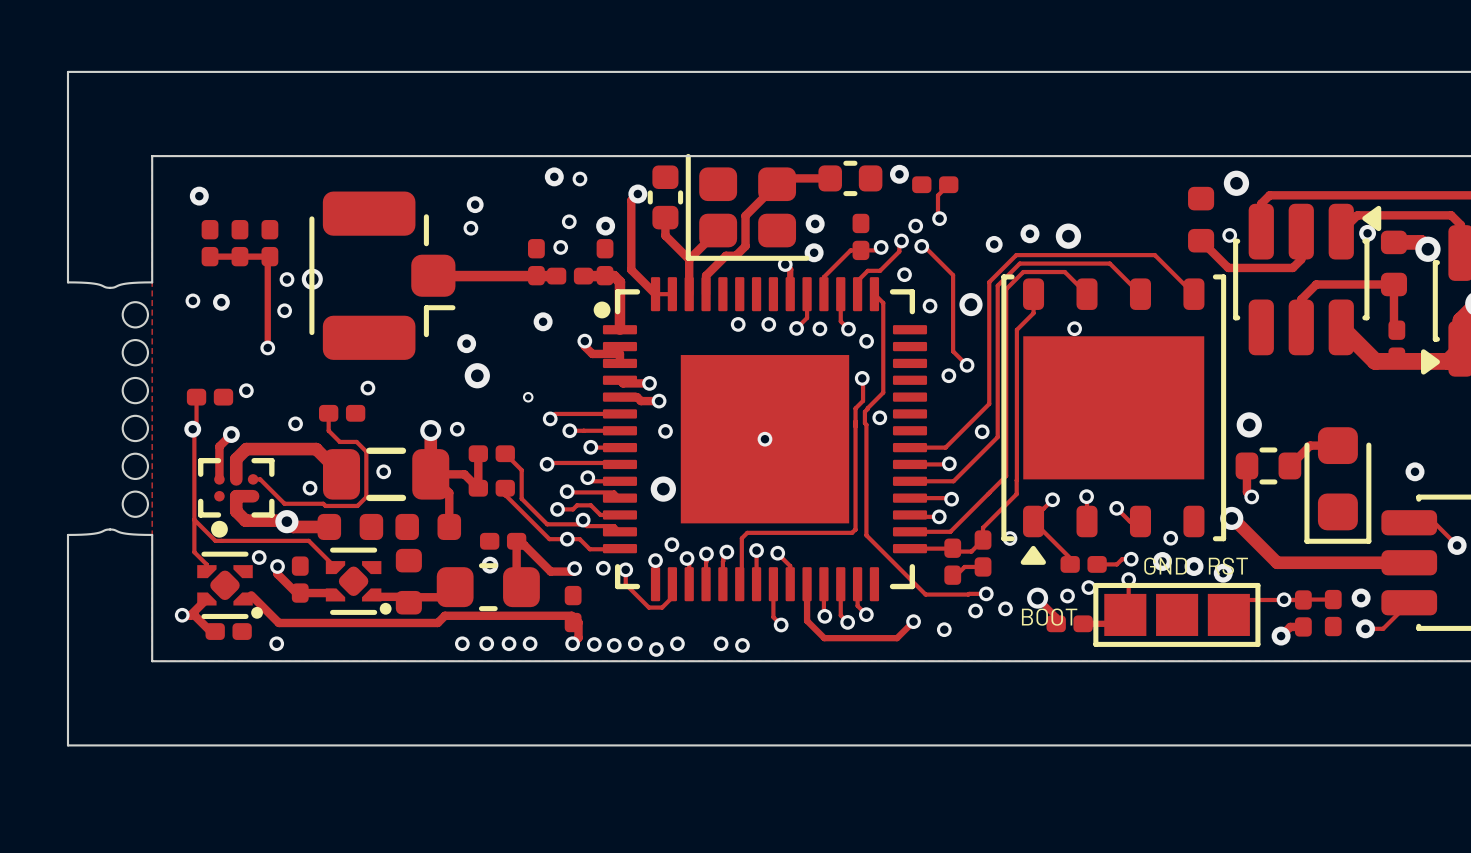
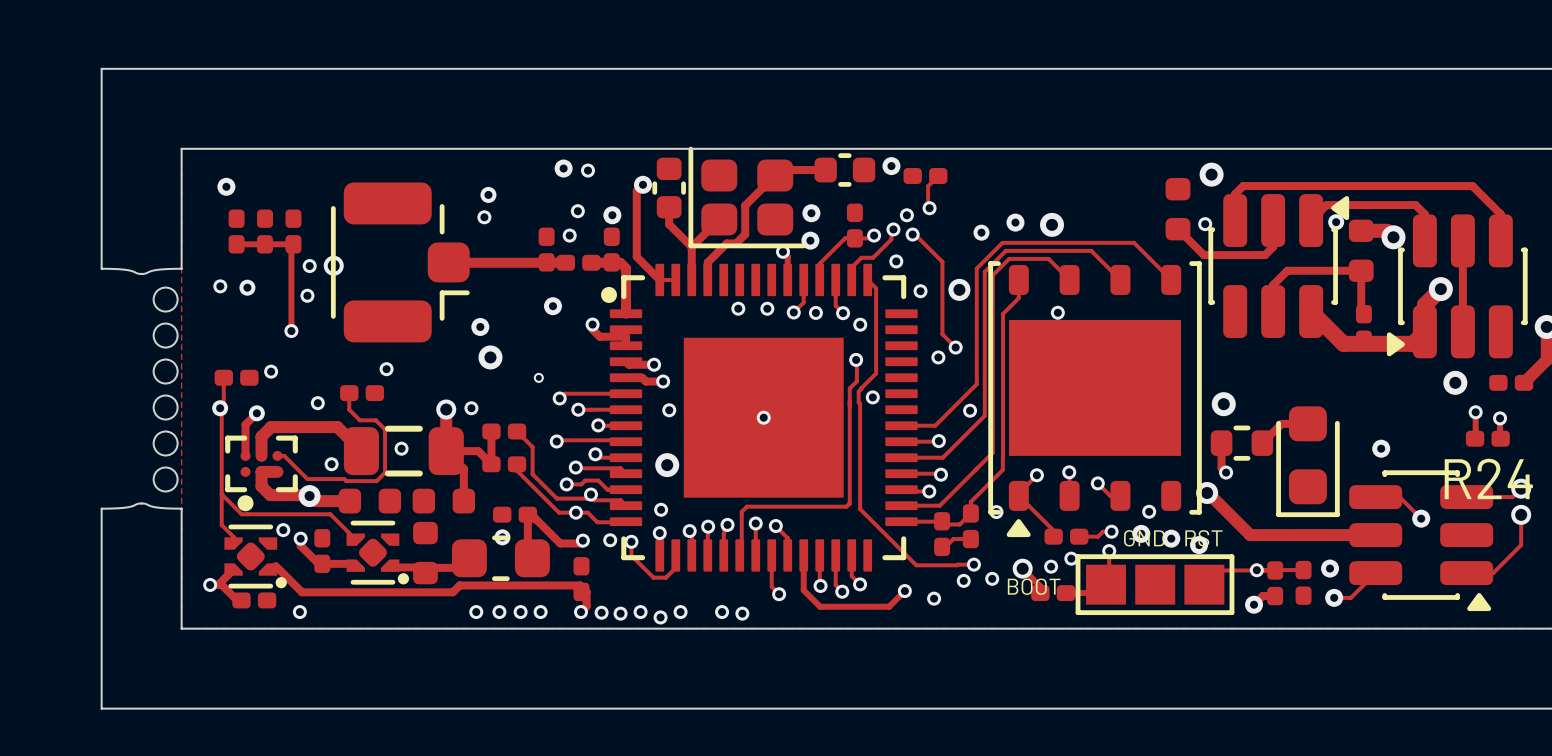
via position: (671, 544) -> (661, 509)

